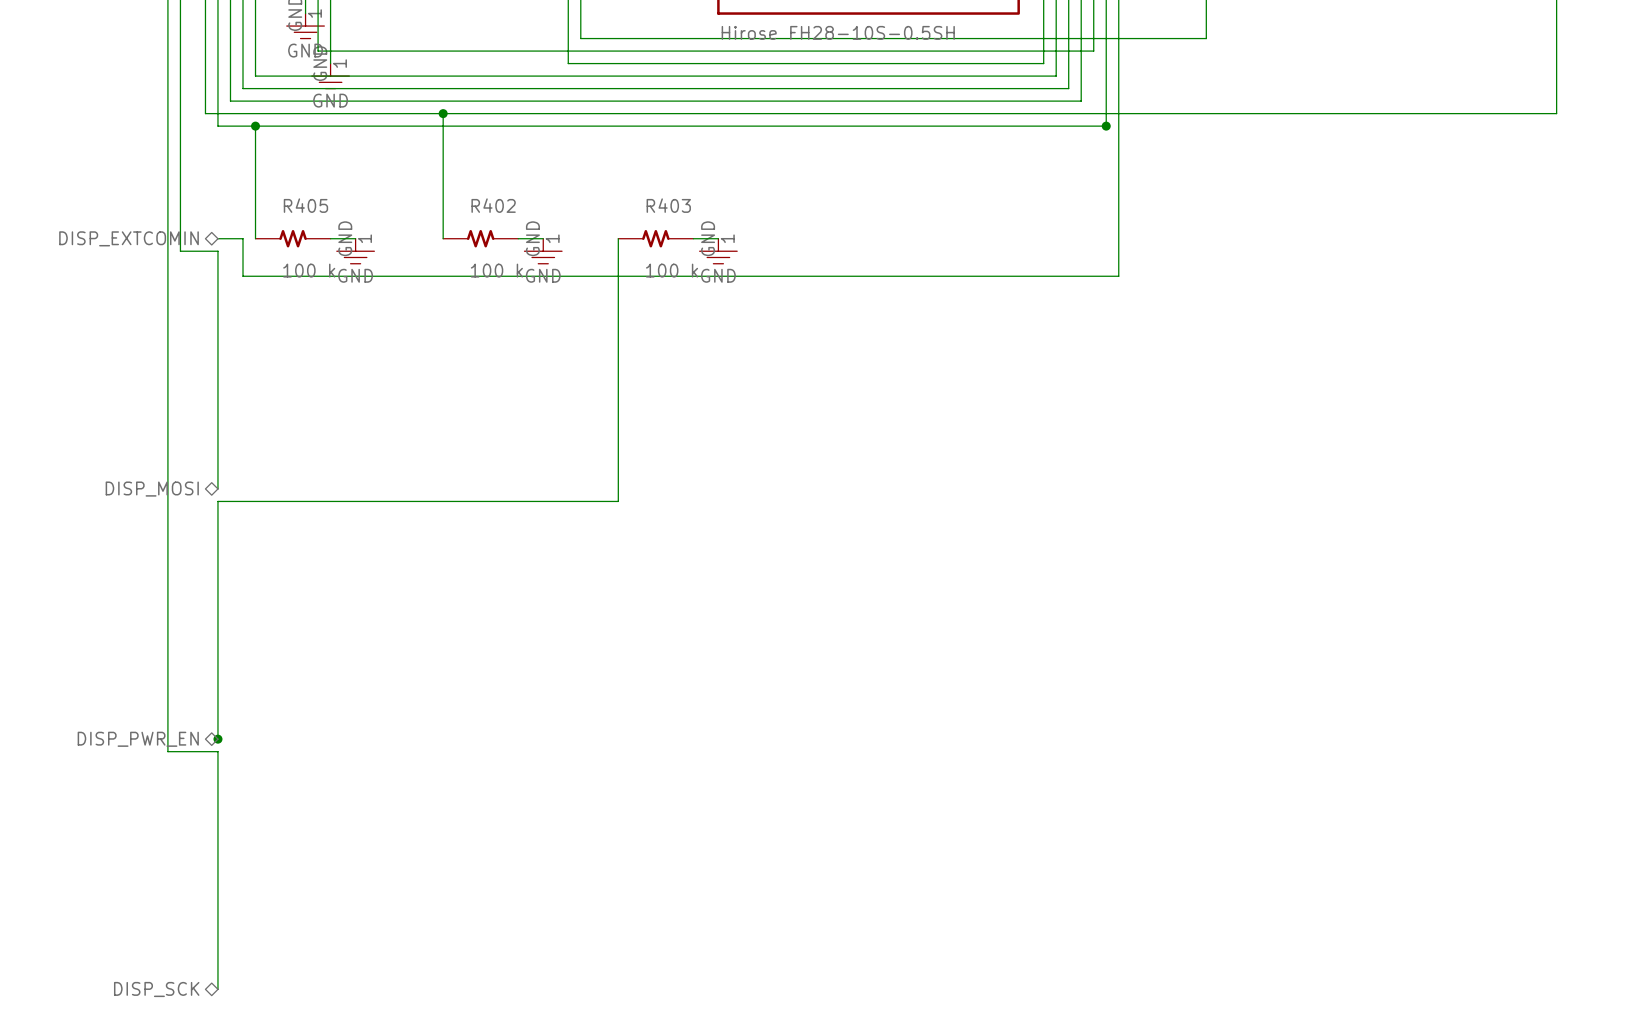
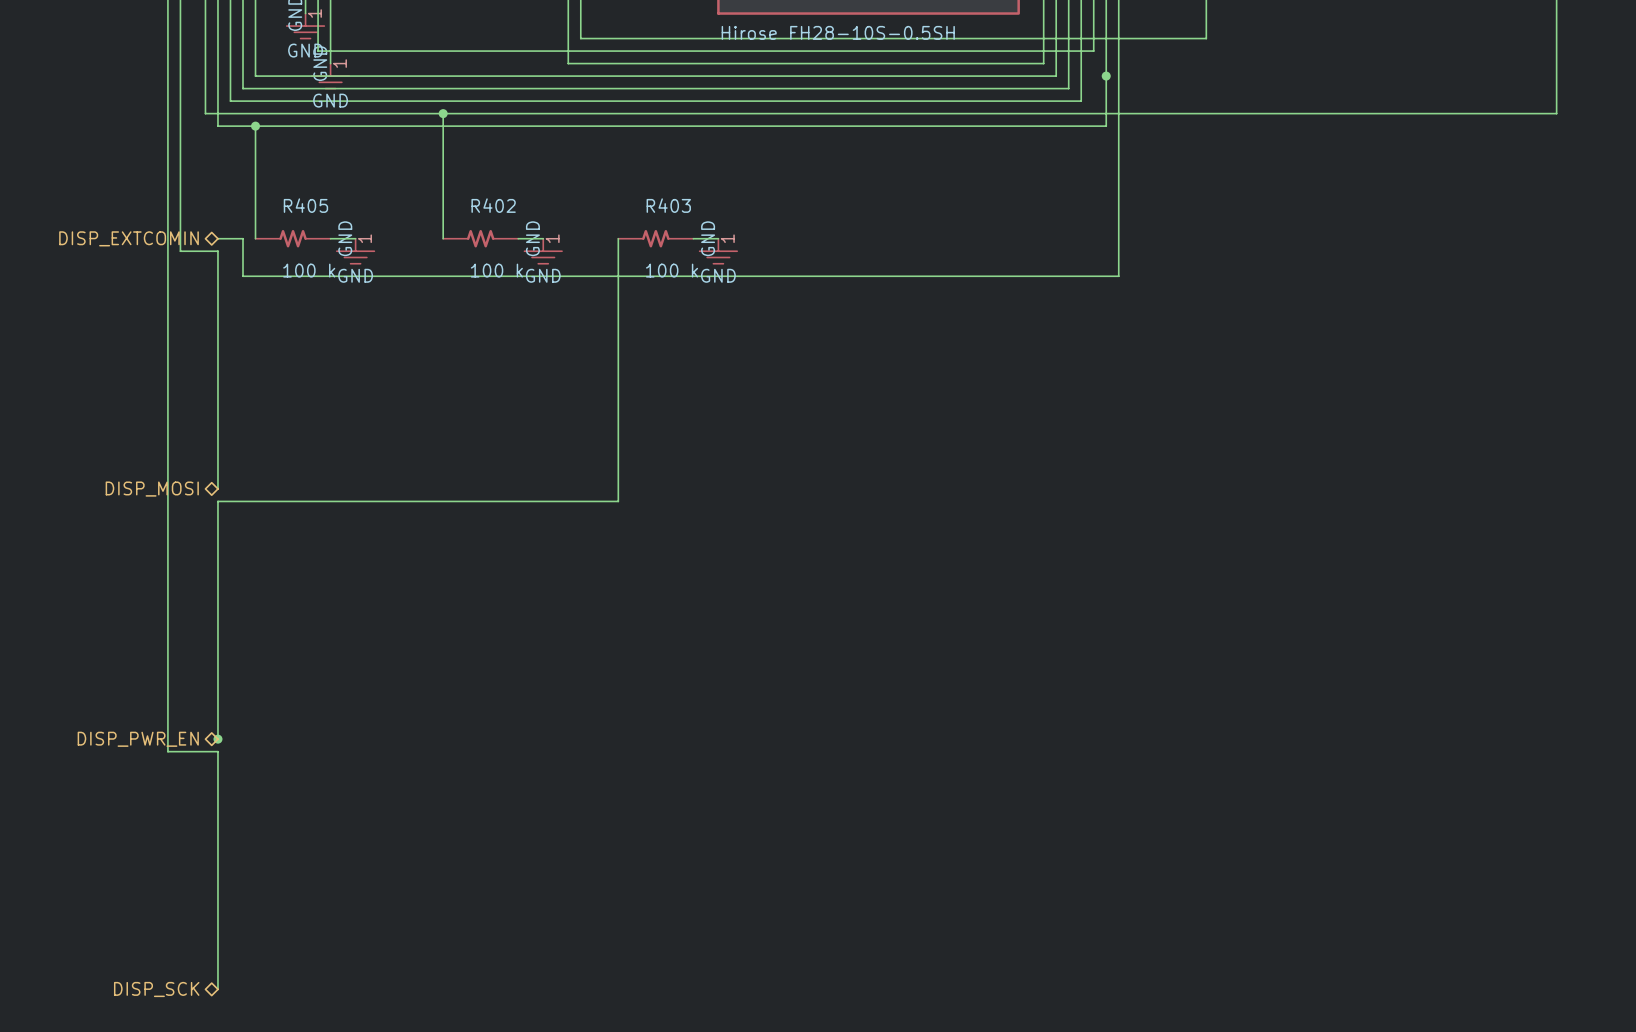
junction position: (1106, 126) -> (1106, 76)

